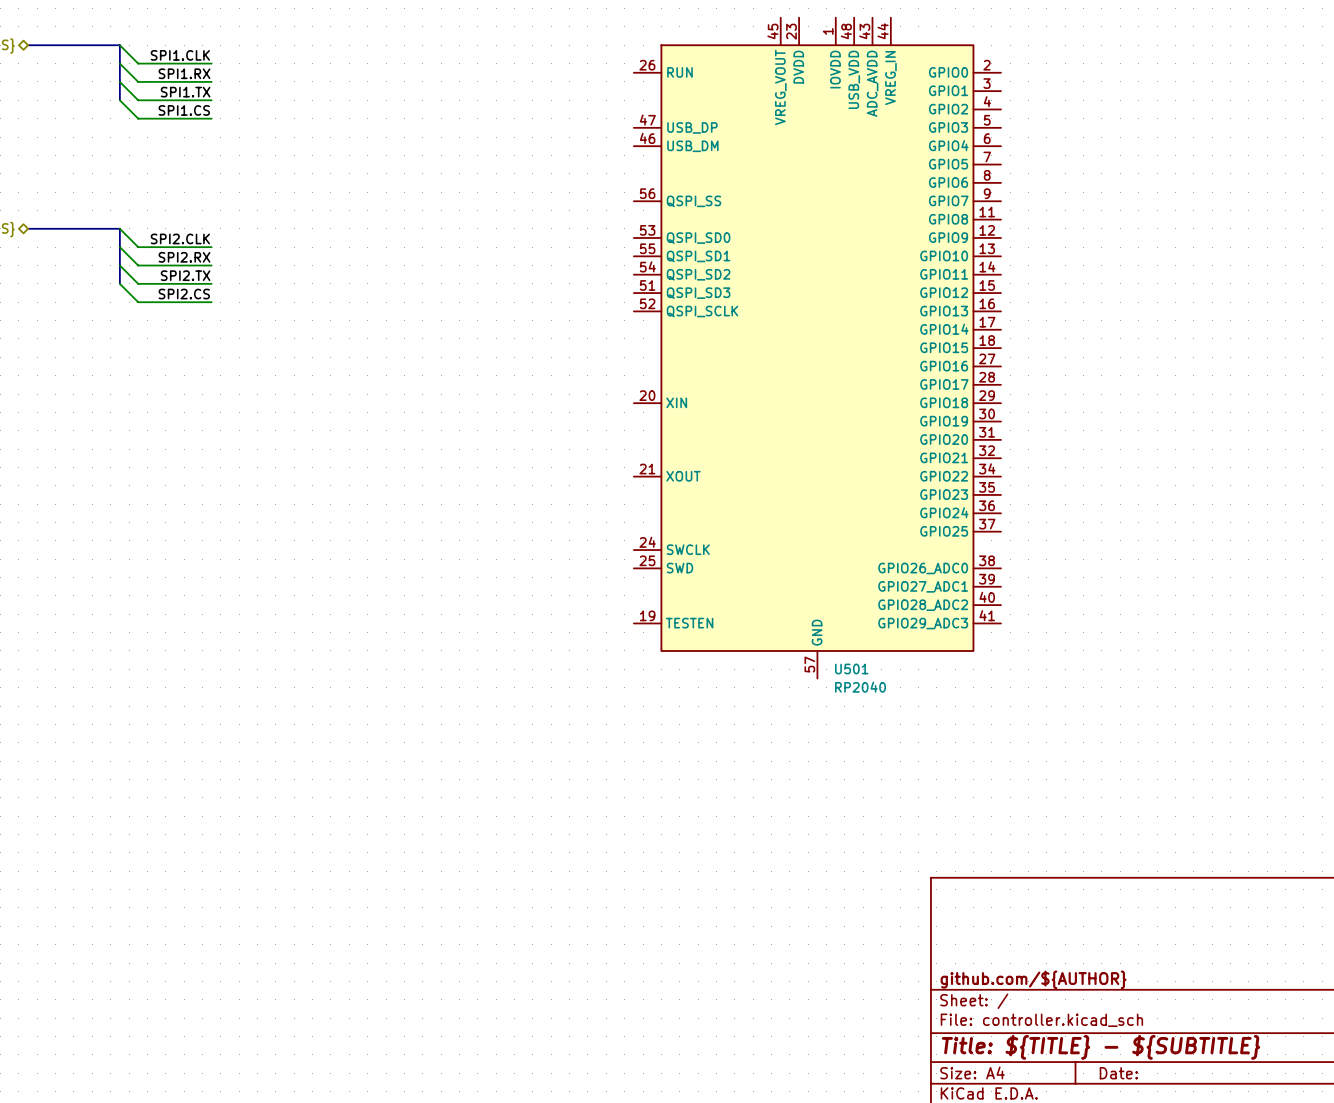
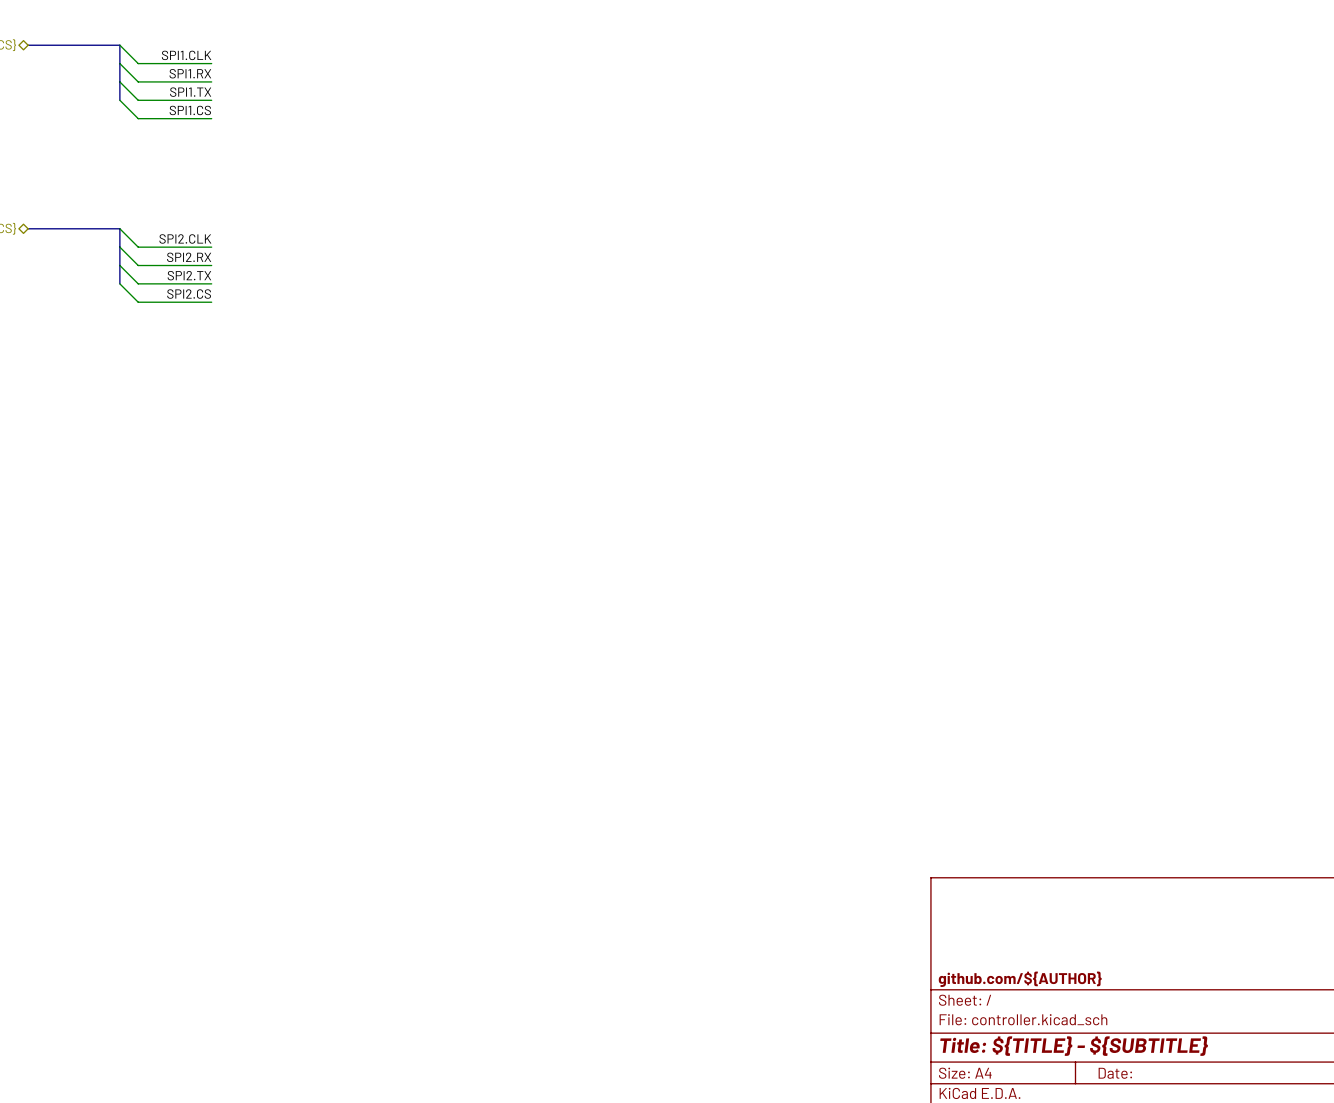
U501: RP2040 (817, 348) -> none

